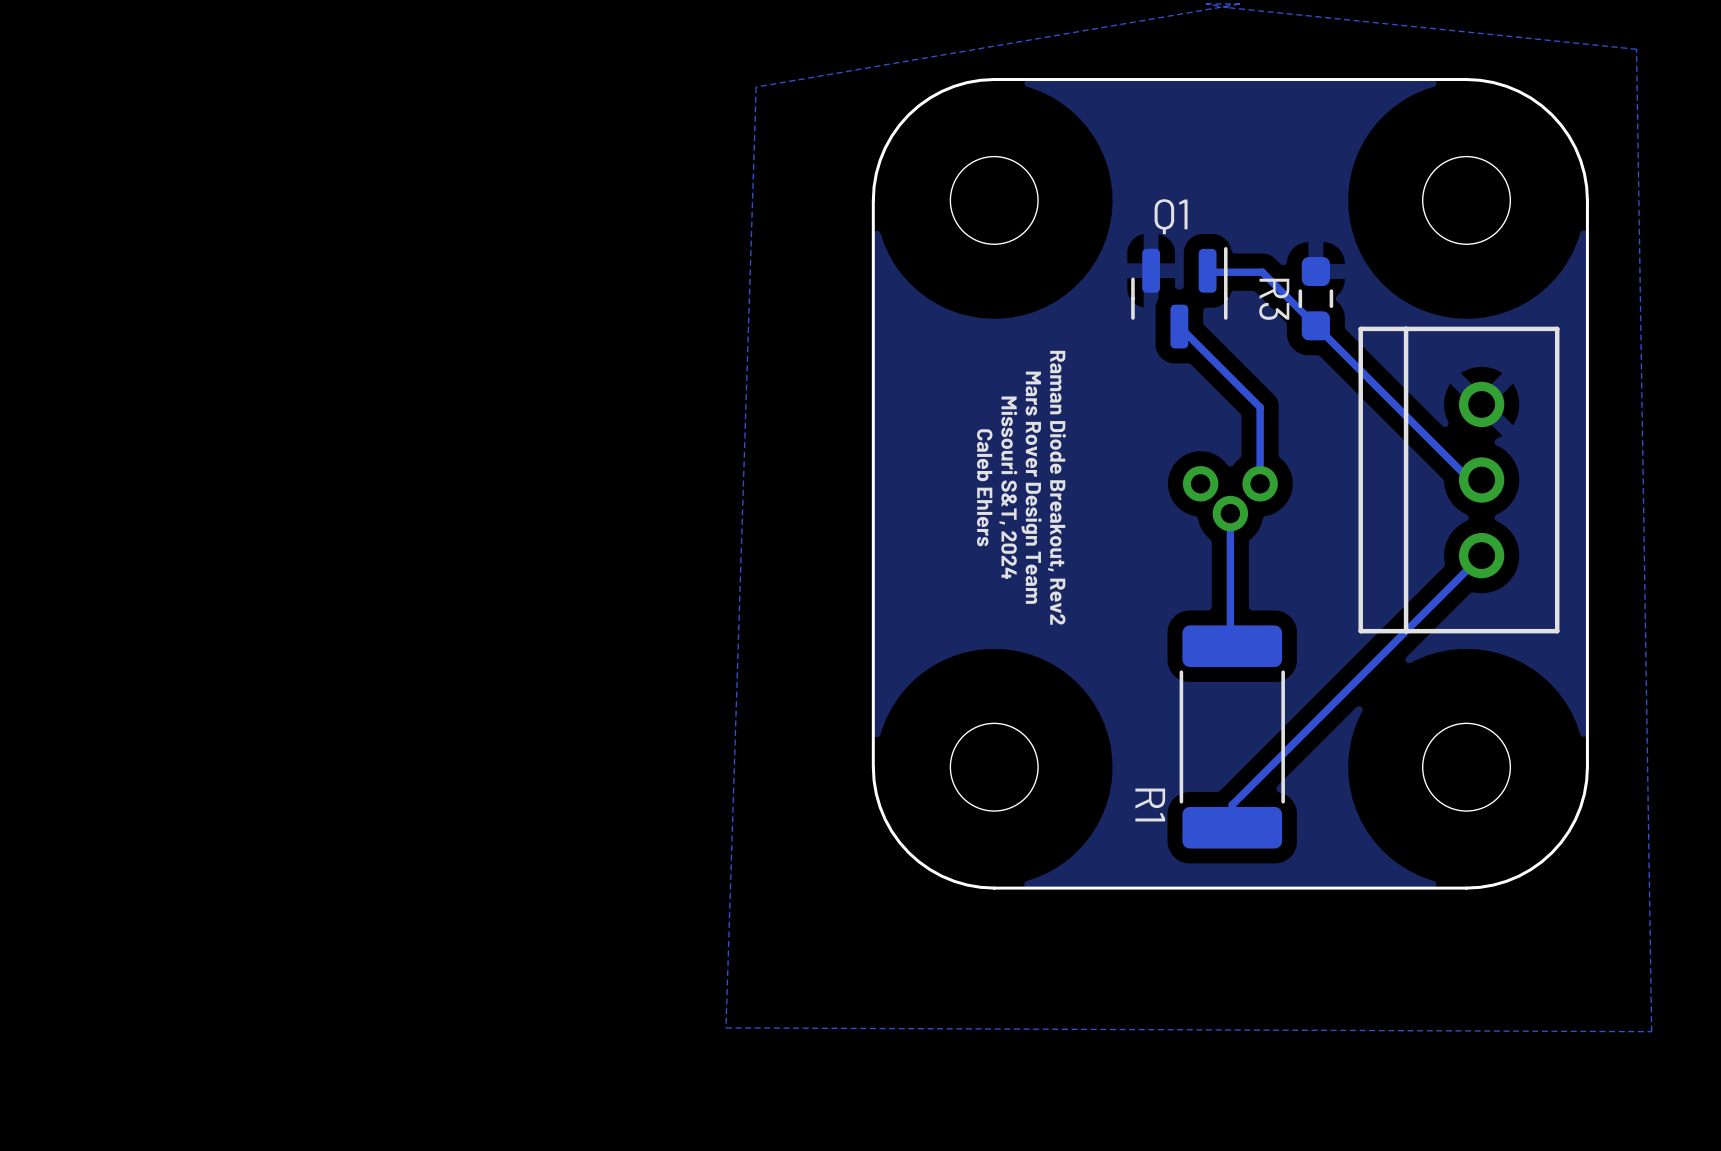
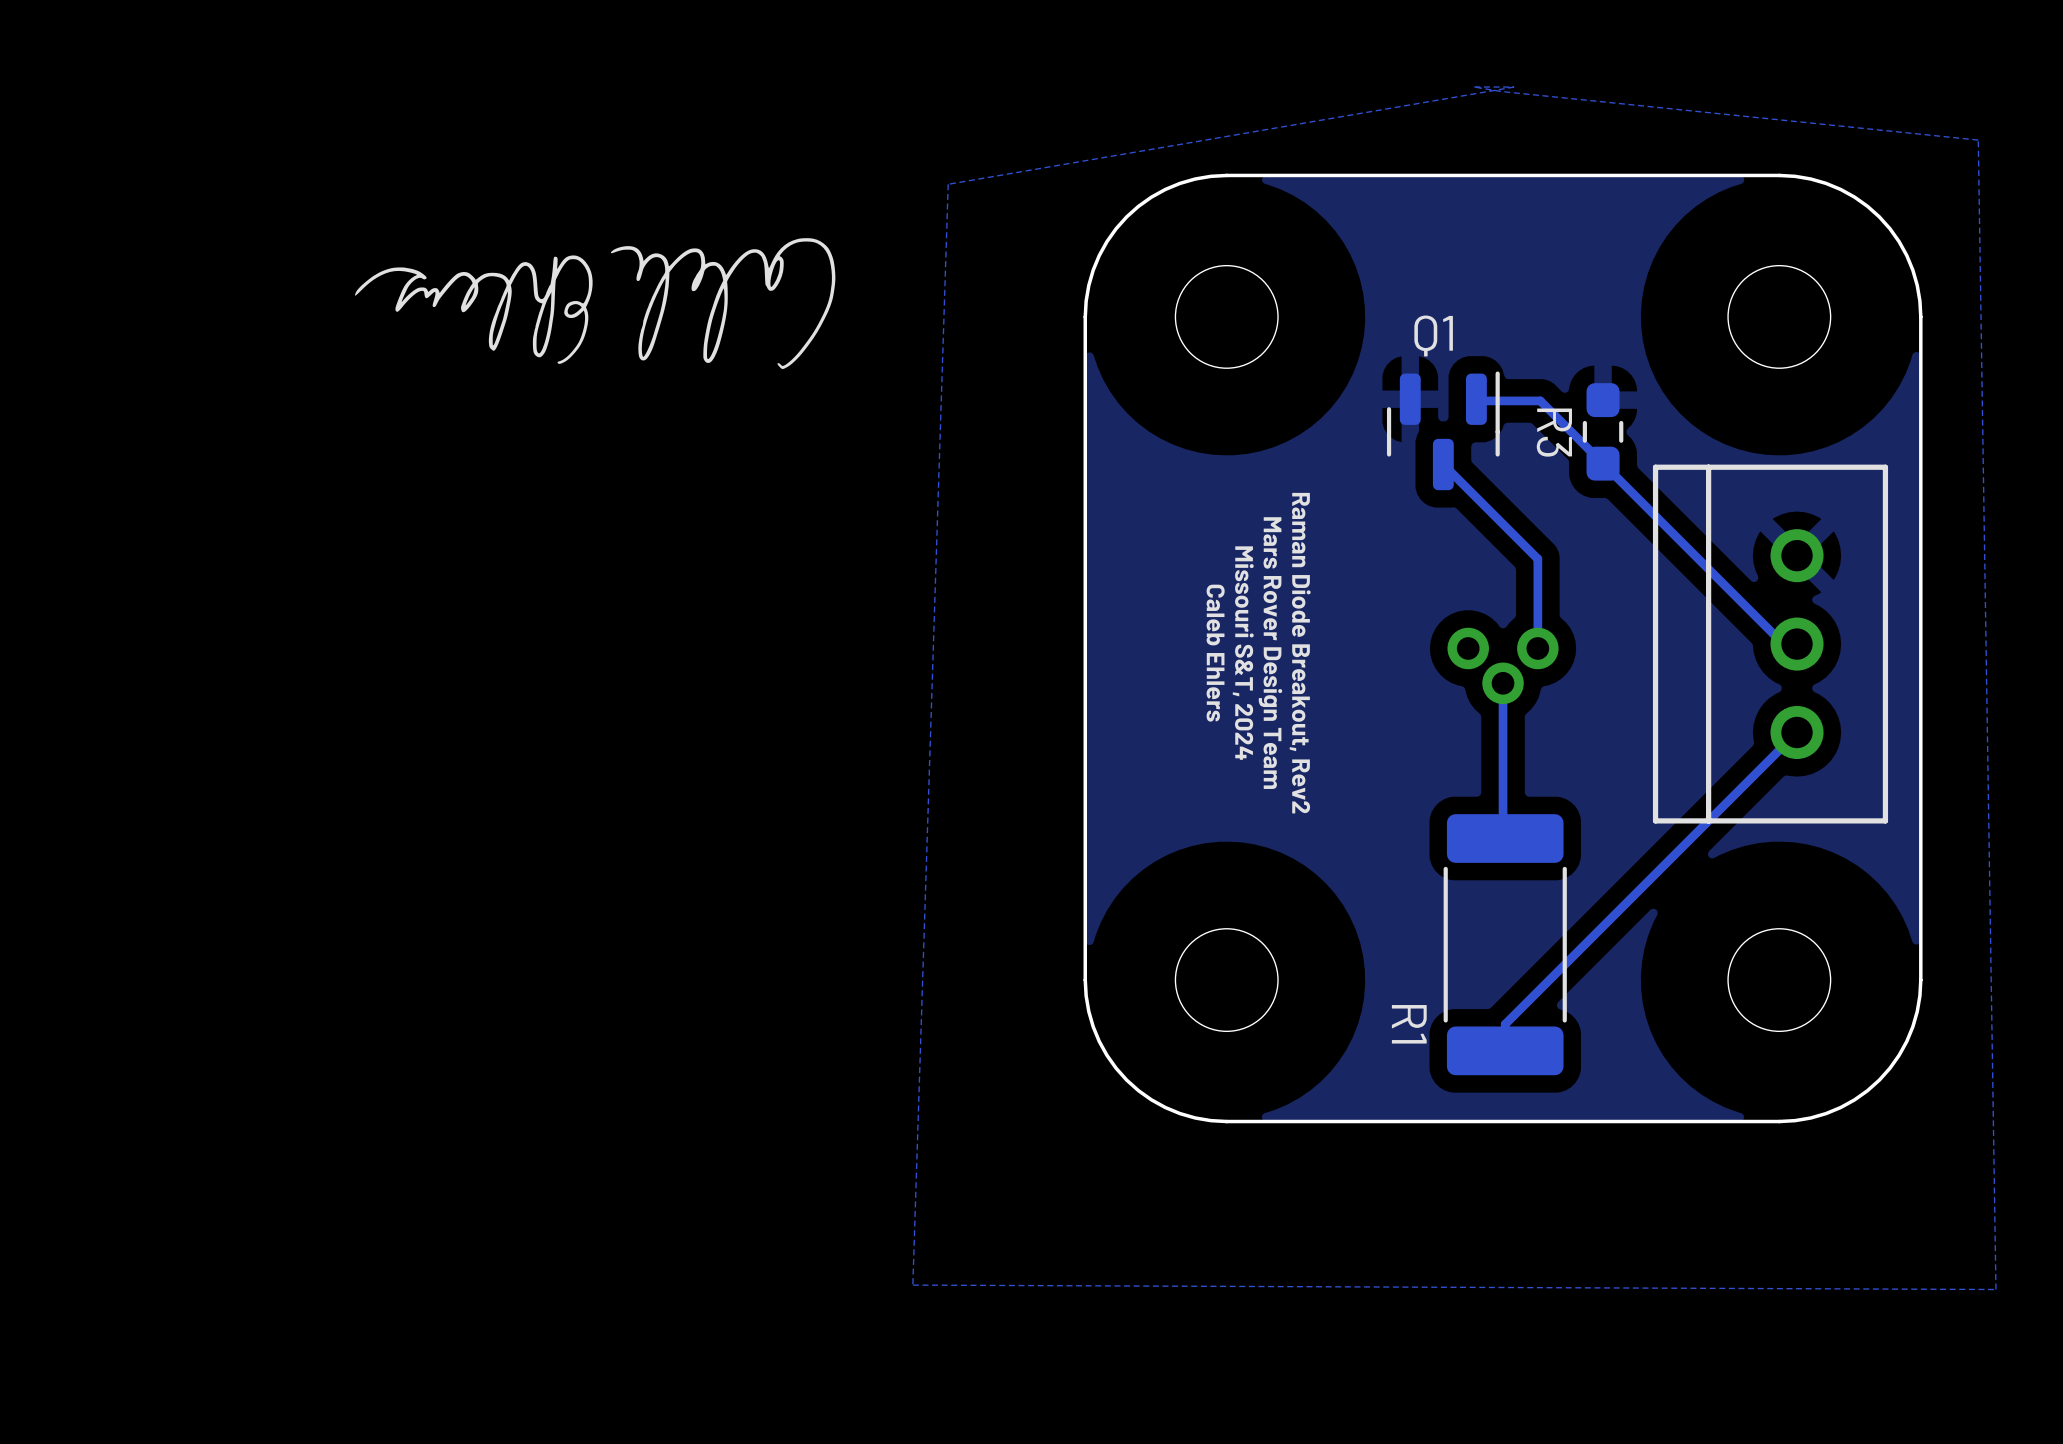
drawing: none -> [354, 238, 836, 370]

